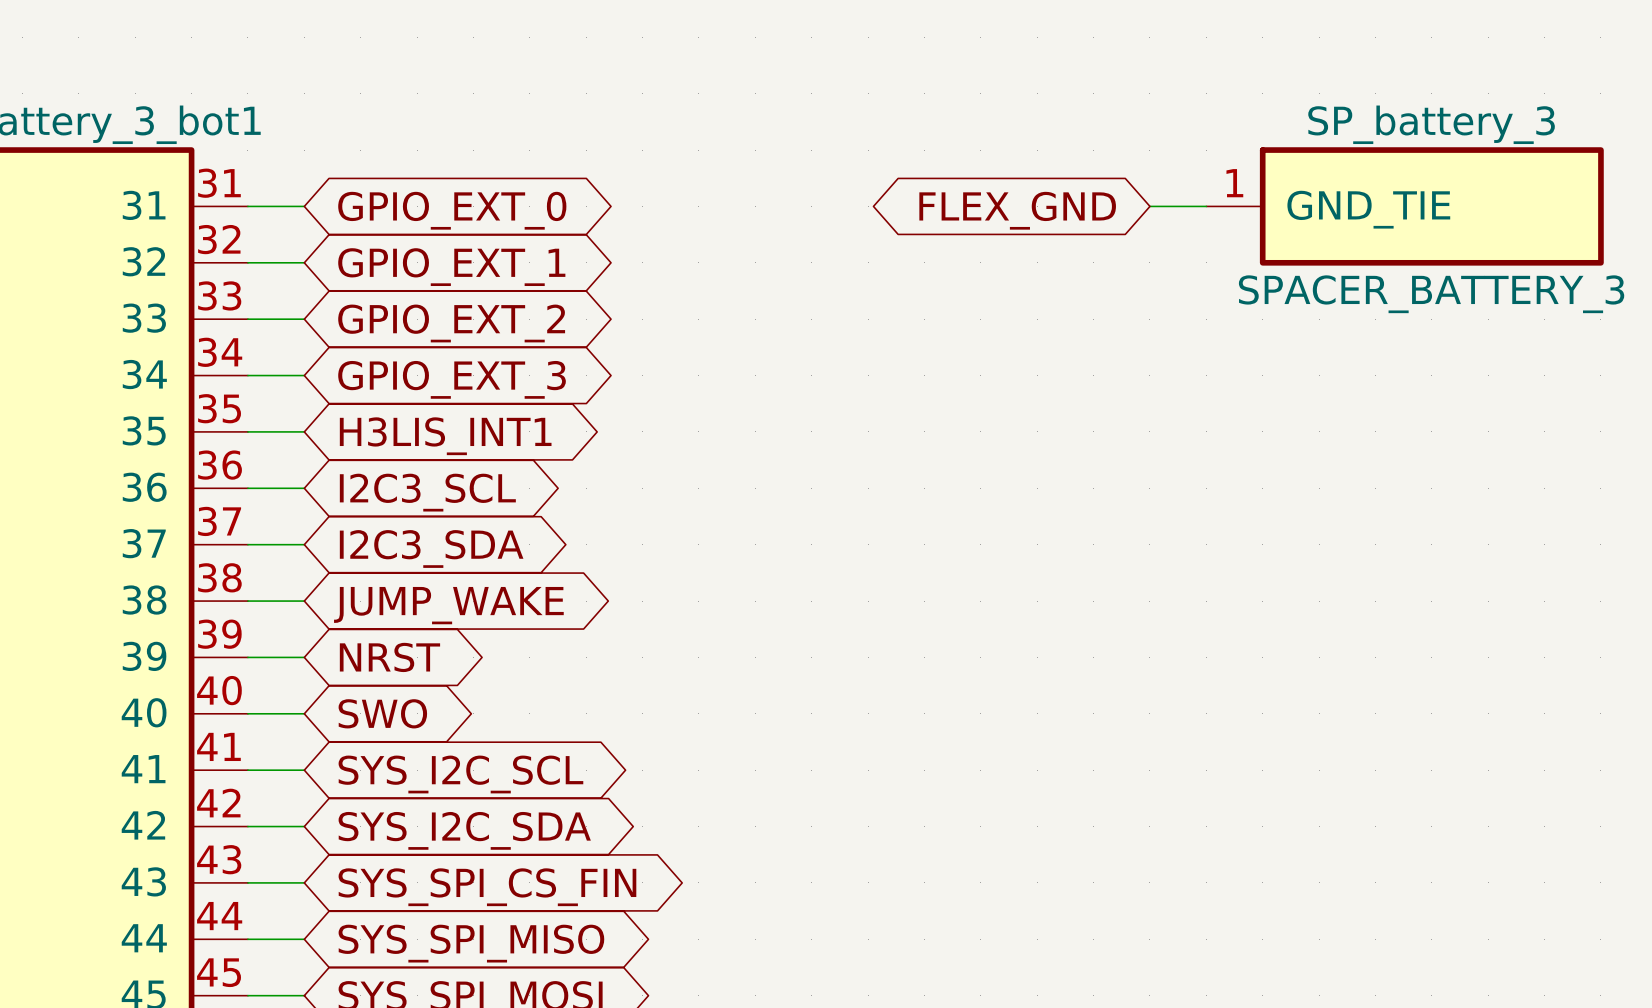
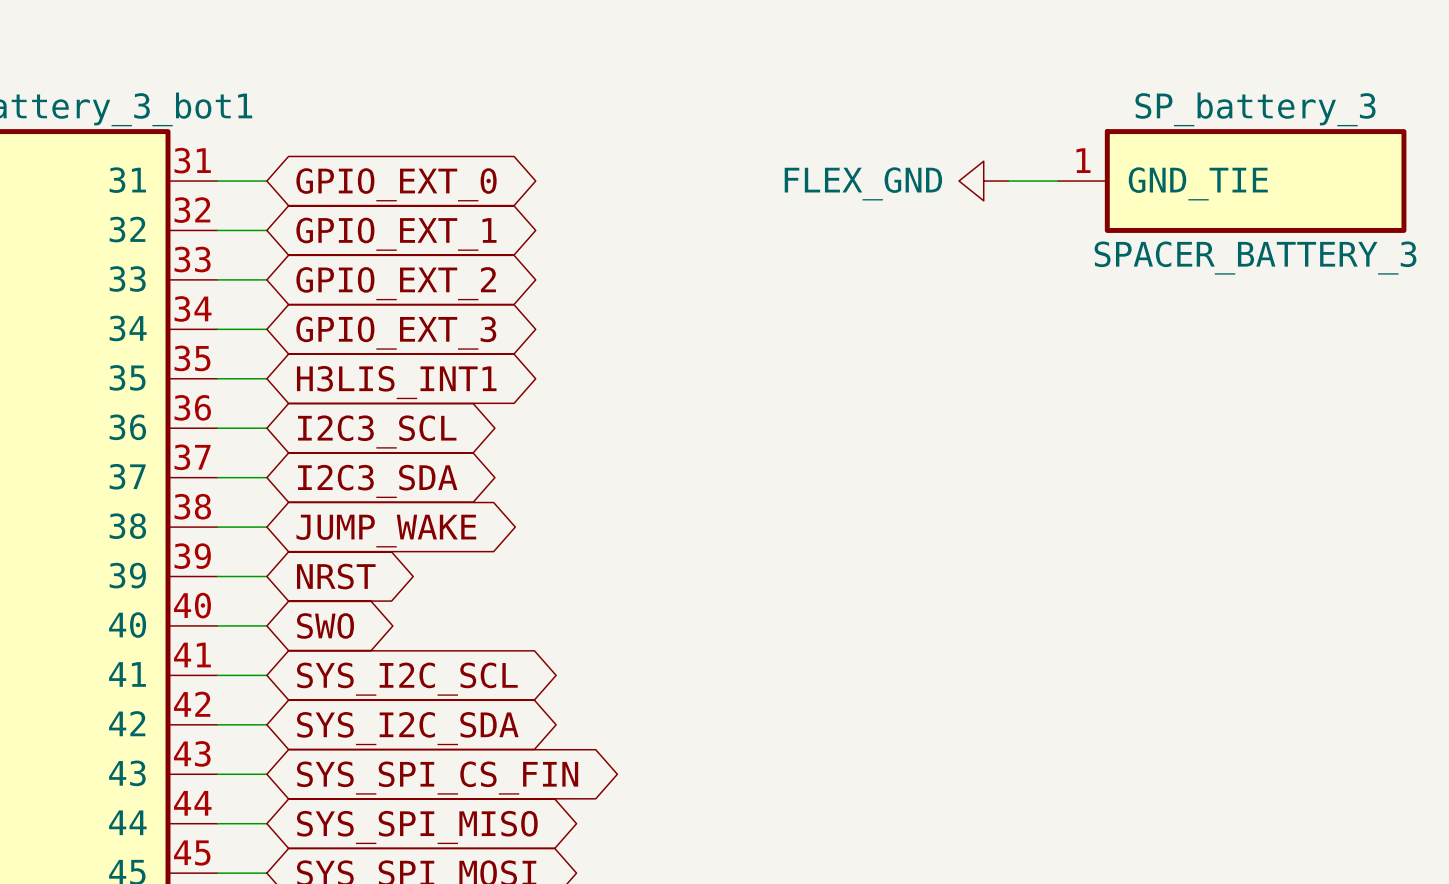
power symbol: none -> FLEX_GND (983, 181)
global label: FLEX_GND (1017, 210) -> none

